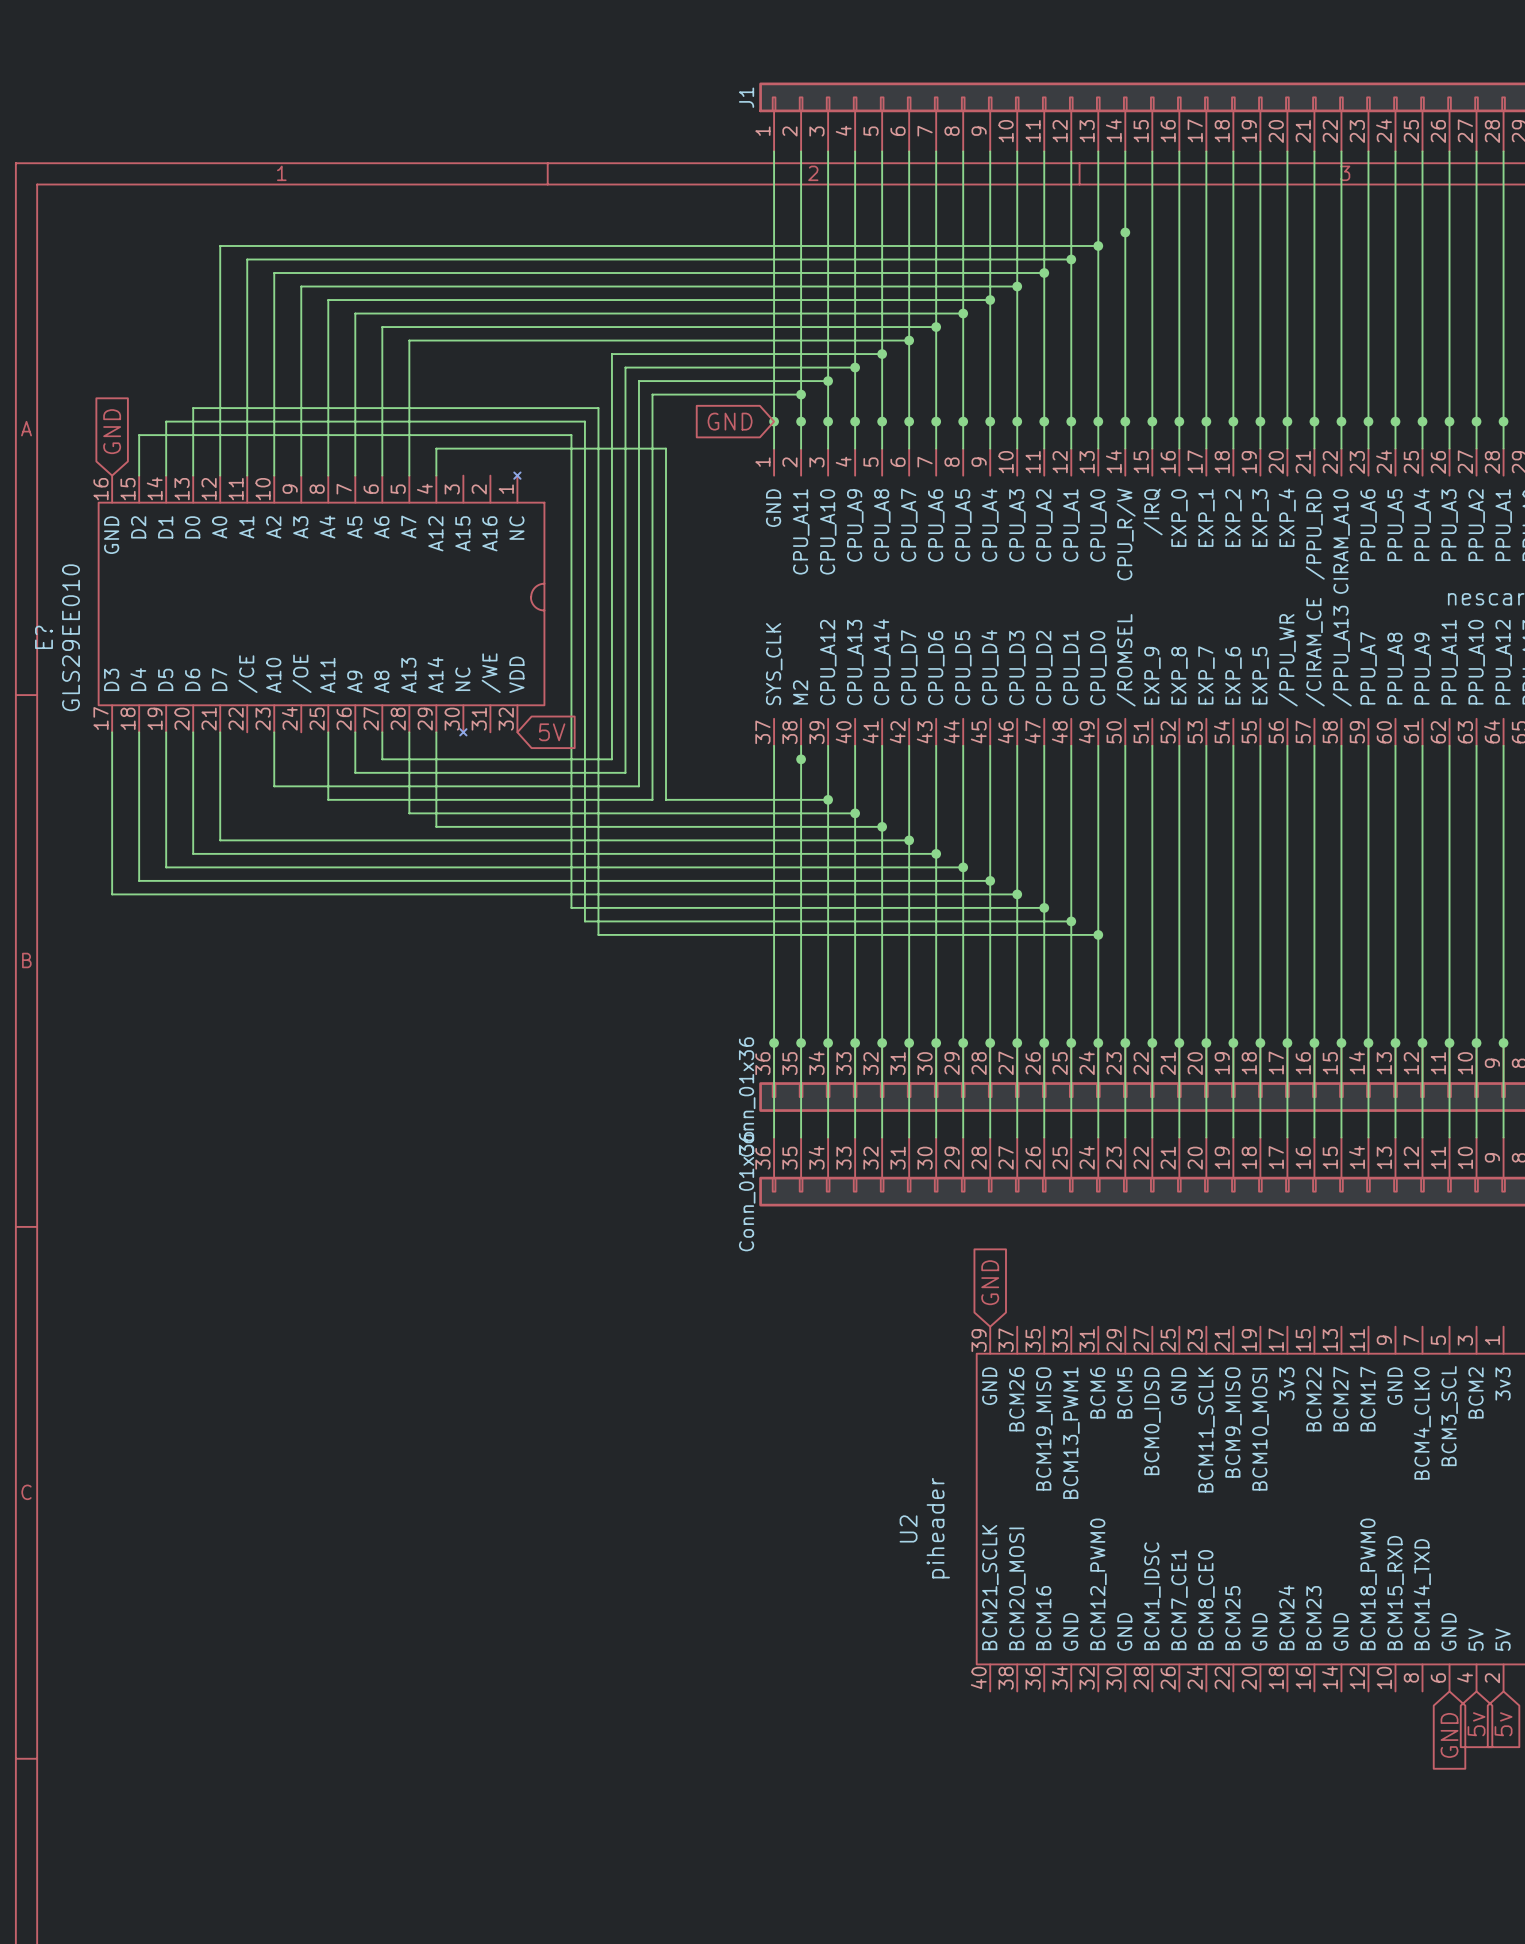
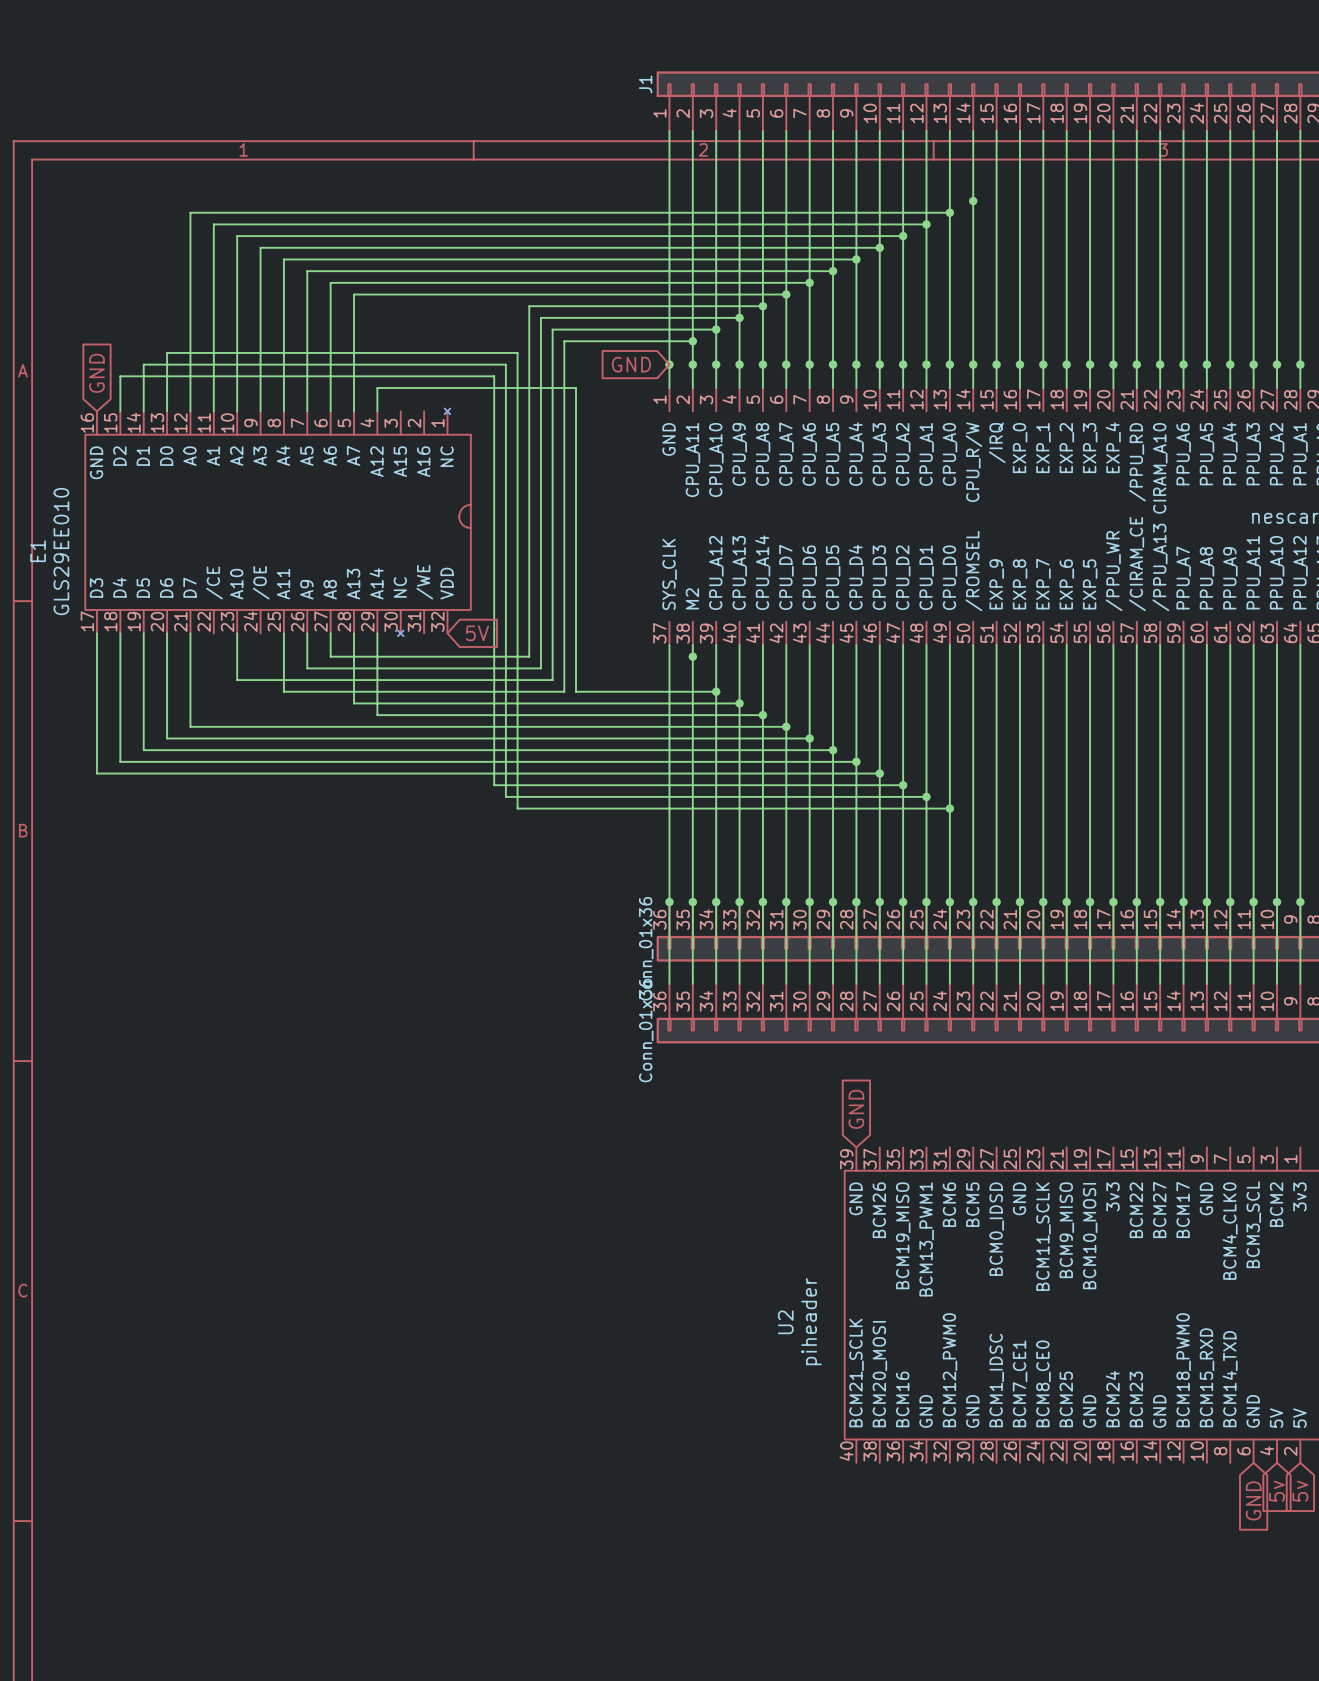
E? name: E? (43, 637) -> E1 (38, 551)

